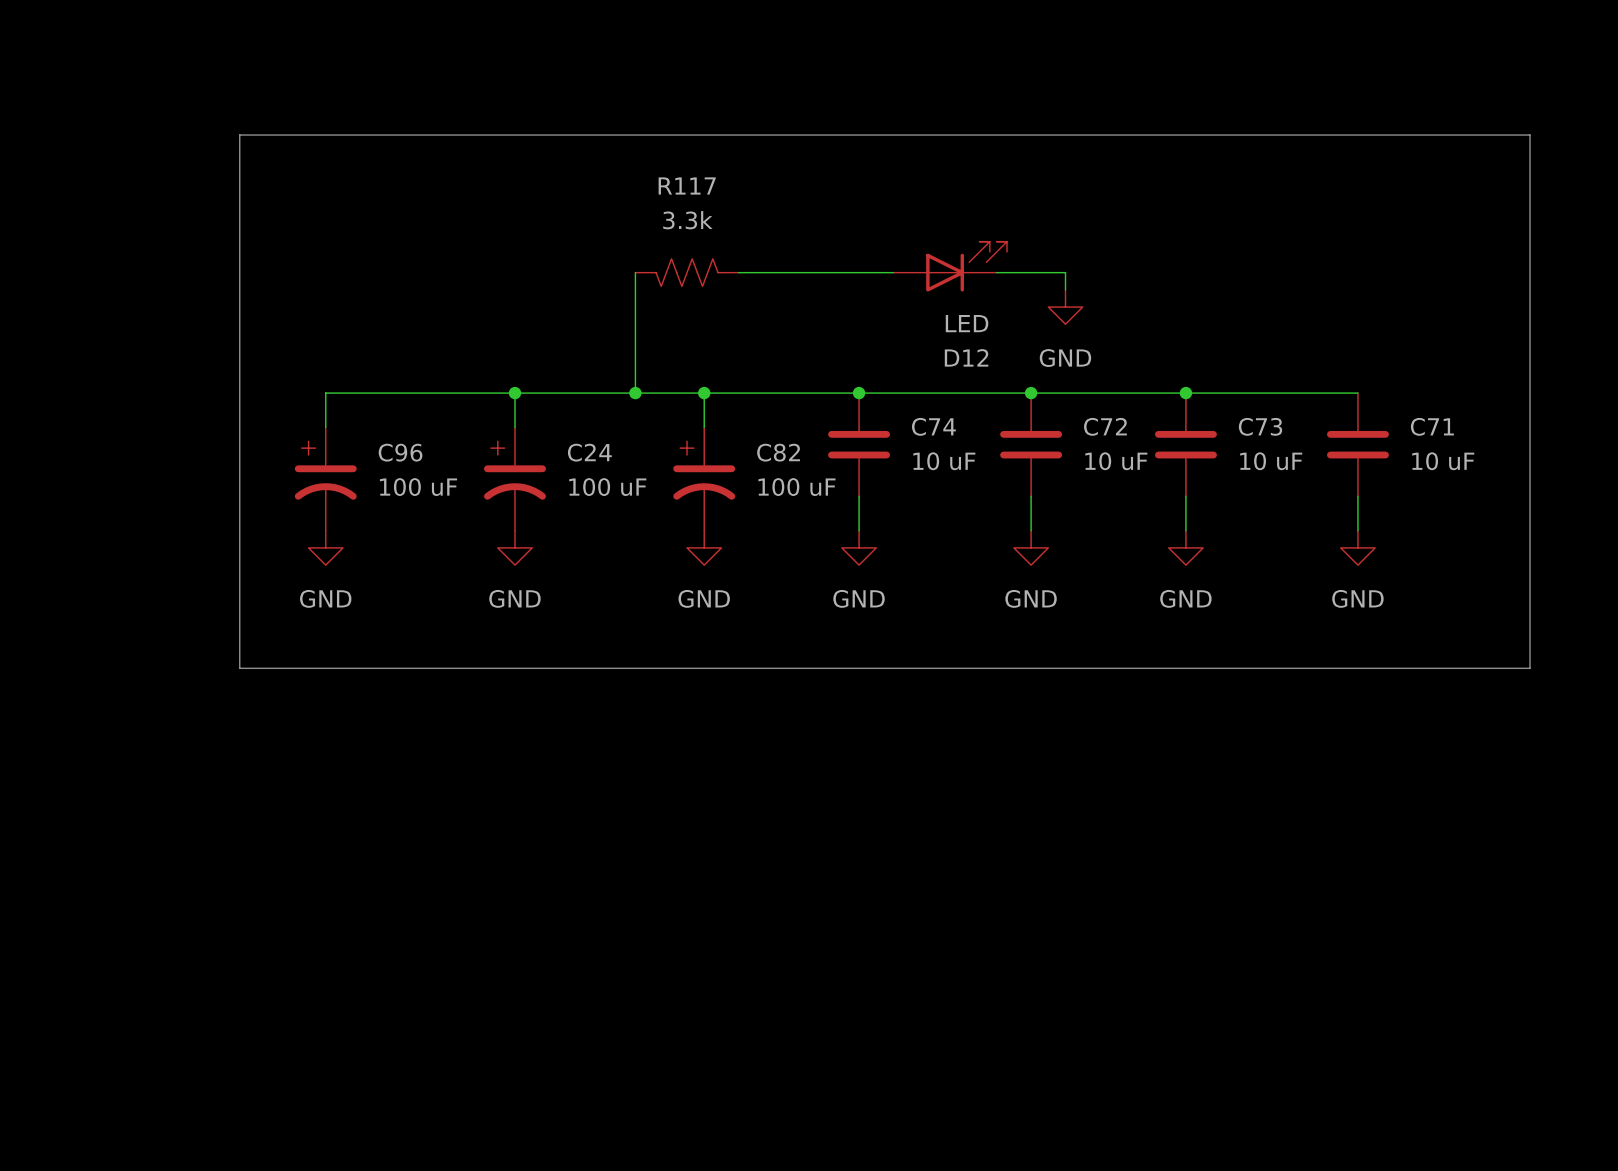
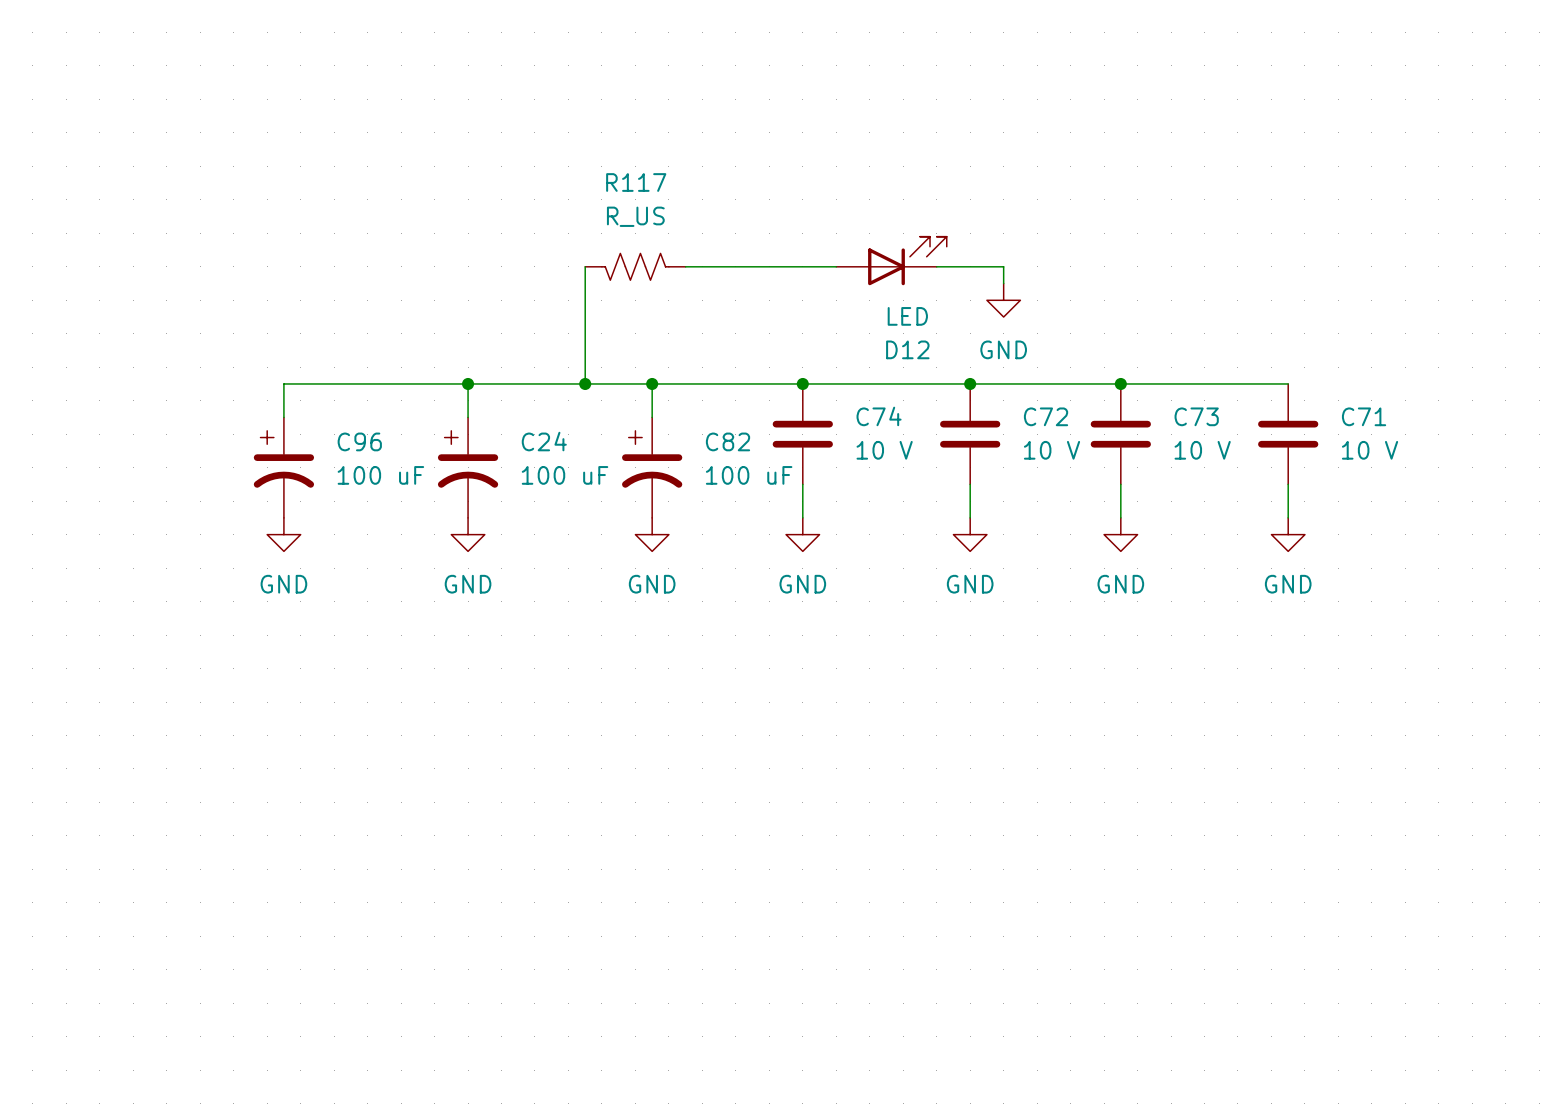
line: (239, 135) (1530, 135) (1530, 668) (239, 668) (239, 135) -> none
R117 value: 3.3k (687, 220) -> R_US (635, 216)
C74 value: 10 uF (944, 461) -> 10 V (884, 450)
C72 value: 10 uF (1116, 461) -> 10 V (1052, 450)
C73 value: 10 uF (1271, 461) -> 10 V (1202, 450)
C71 value: 10 uF (1443, 461) -> 10 V (1370, 450)

